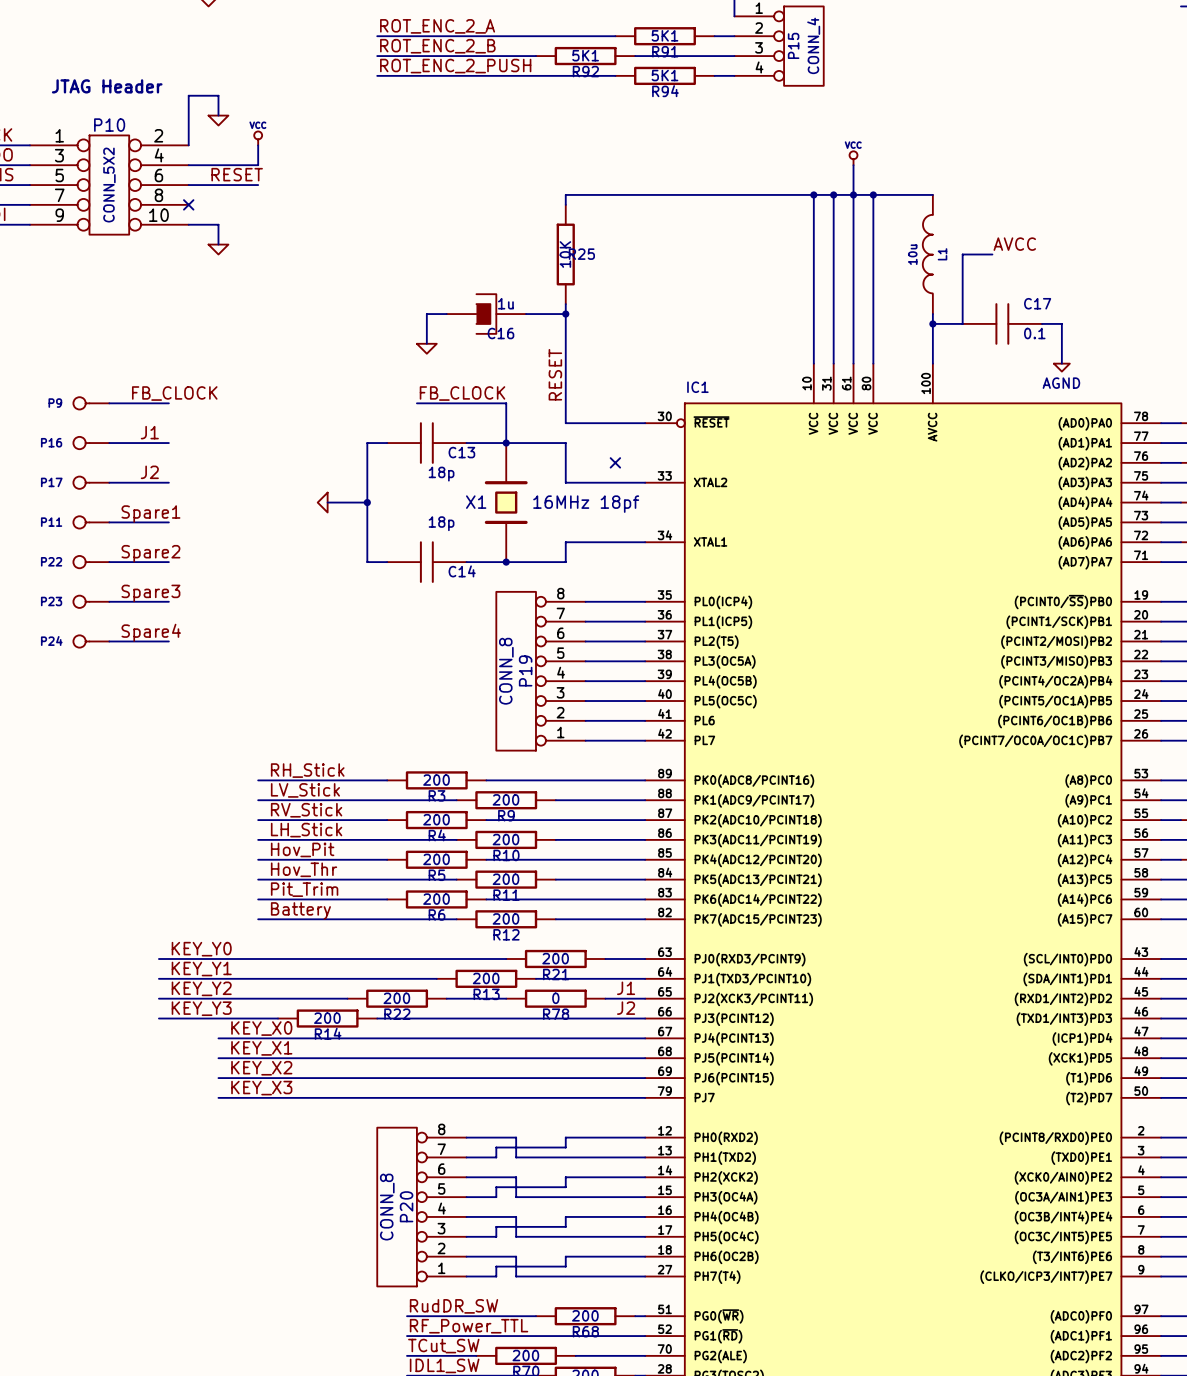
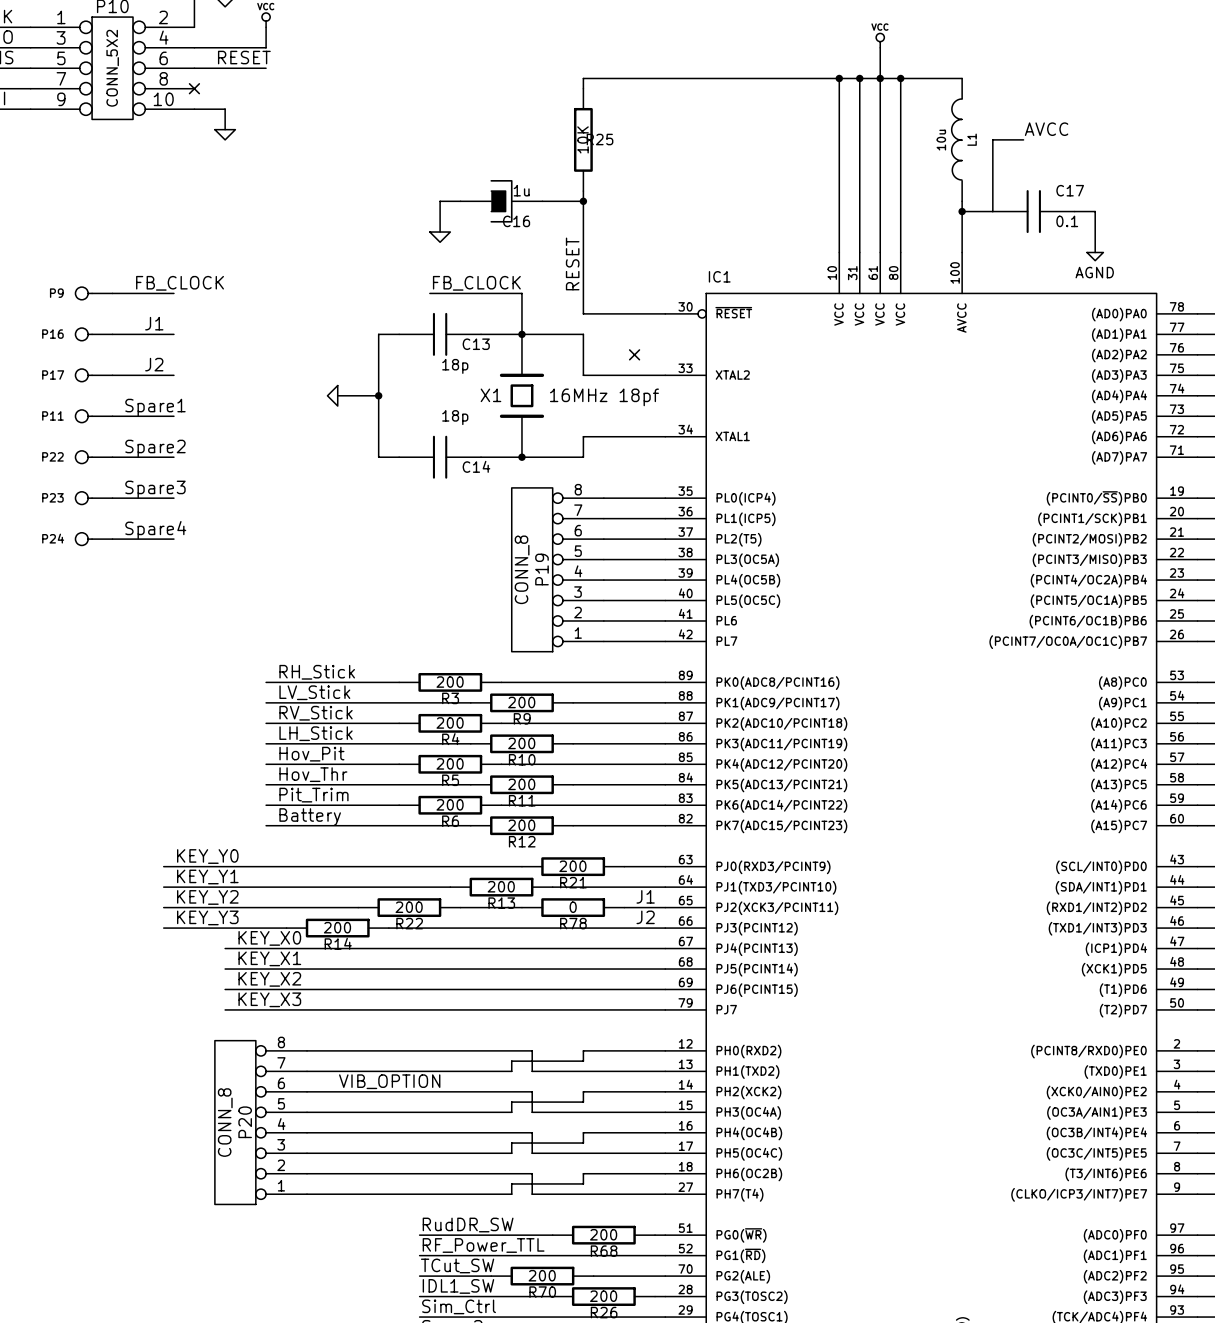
wire: none -> (307, 1050) (481, 1050)
wire: none -> (307, 1071) (481, 1071)
label: none -> VIB_OPTION (389, 1081)
wire: none -> (307, 1091) (481, 1091)
wire: none -> (307, 1112) (481, 1112)
P20 position: (421, 1207) -> (260, 1122)
wire: none -> (307, 1132) (481, 1132)
wire: none -> (307, 1153) (481, 1153)
wire: none -> (307, 1173) (481, 1173)
wire: none -> (307, 1194) (481, 1194)

